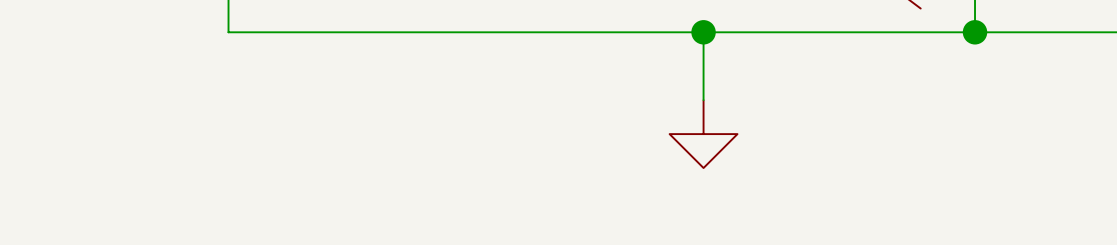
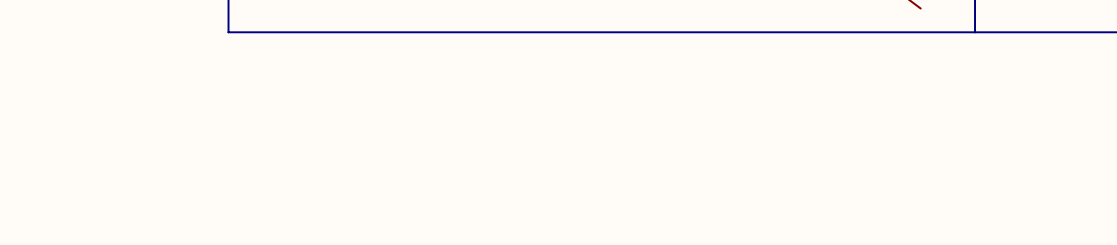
wire: (703, 32) (703, 100) -> none
junction: (703, 32) -> none
junction: (975, 32) -> none
power symbol: (703, 134) -> none

